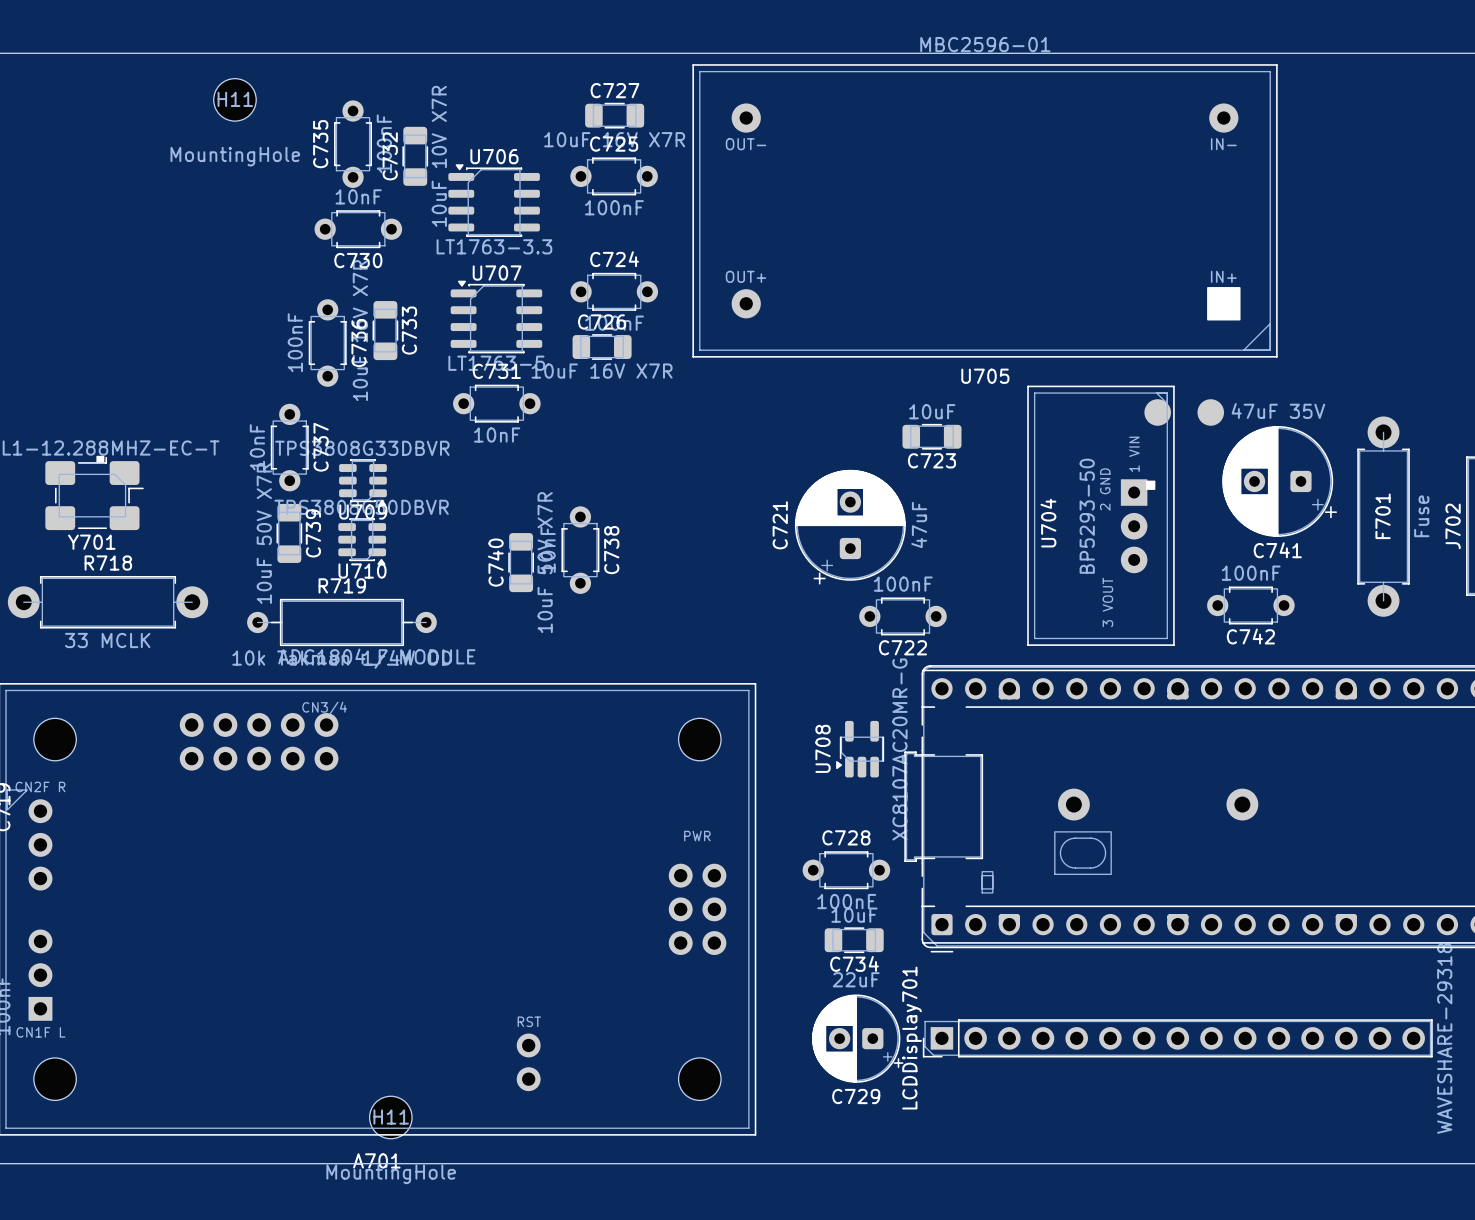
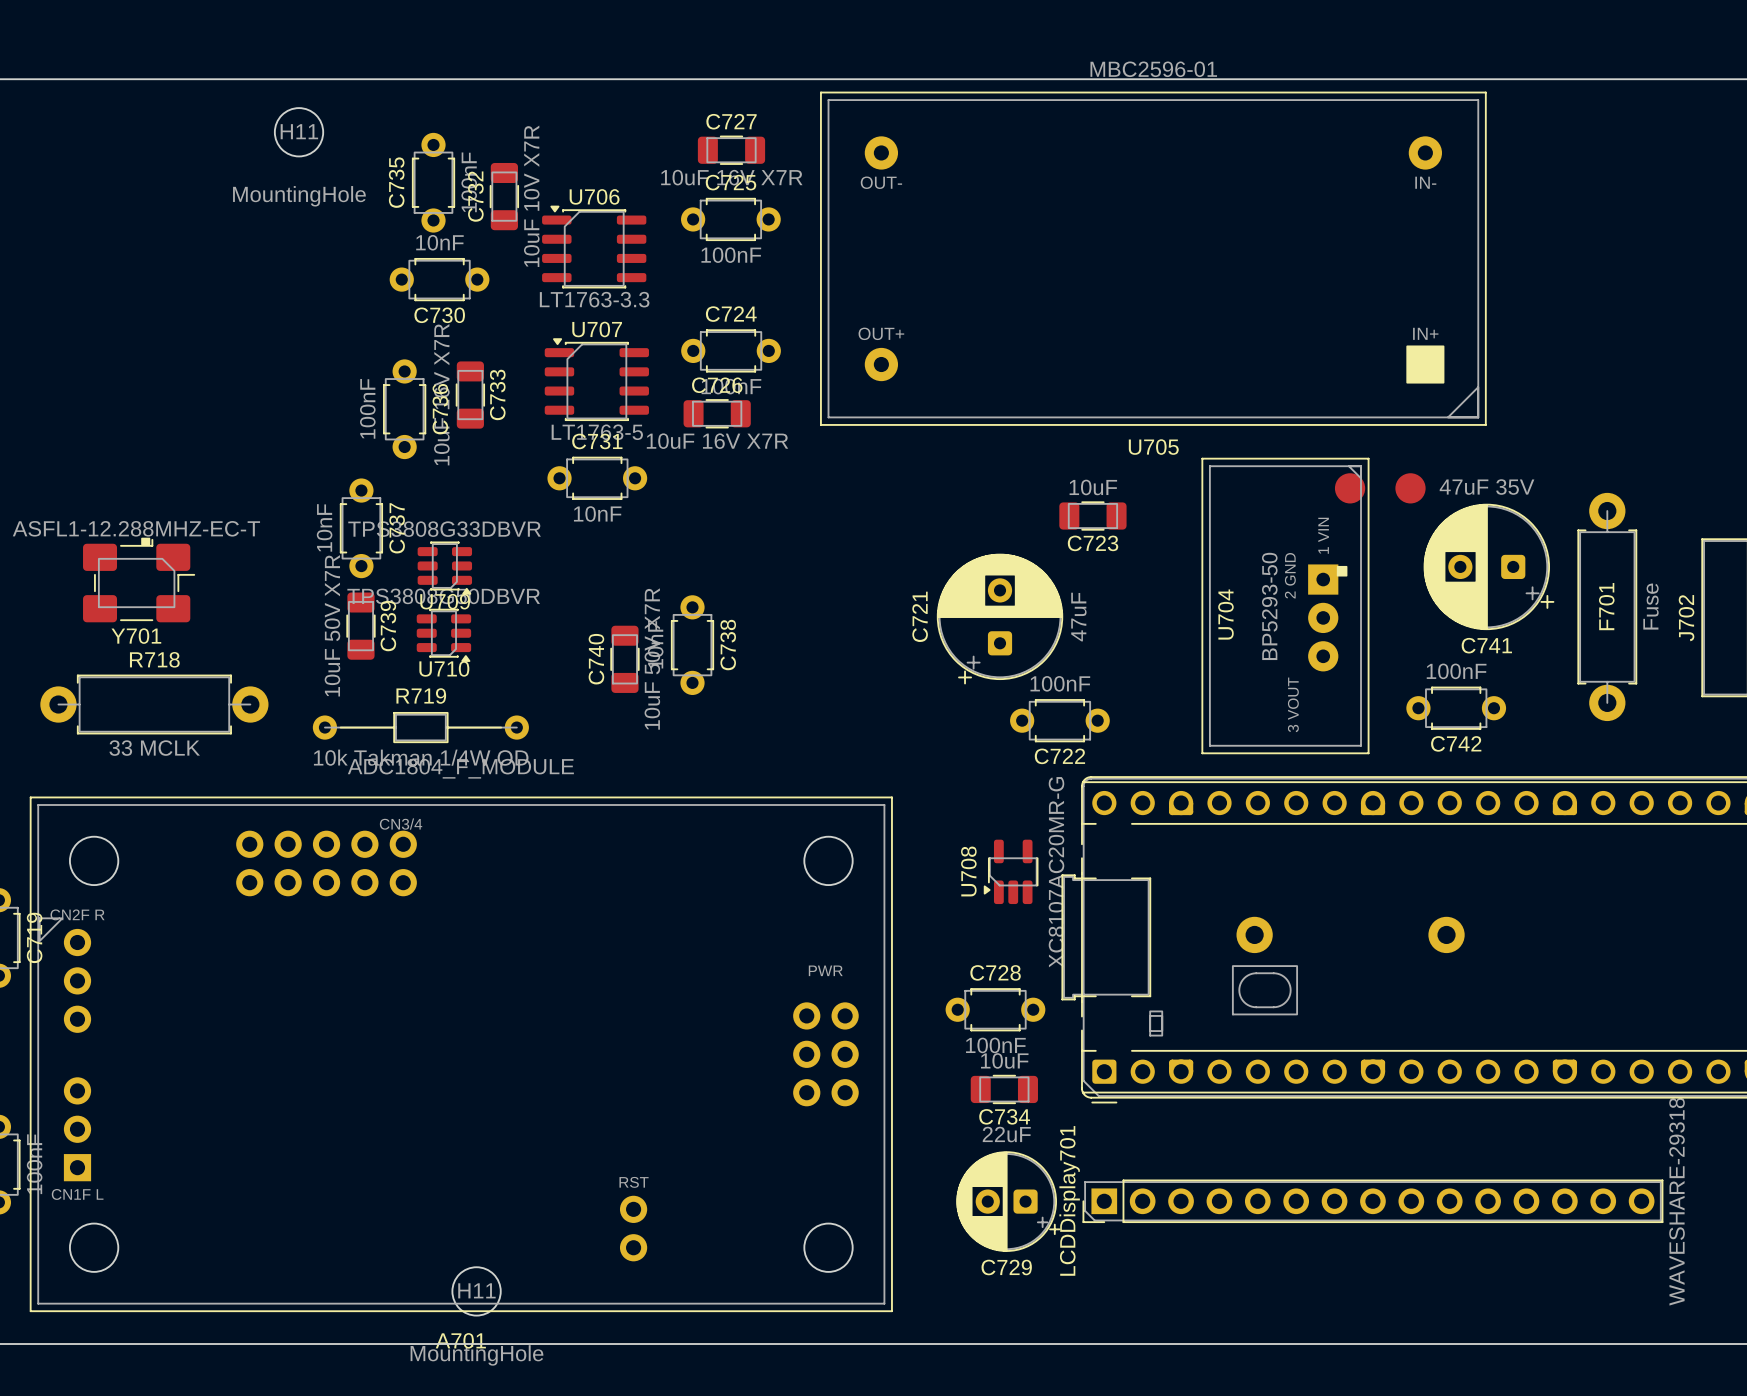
R719 footprint: [247, 598, 437, 647] -> [312, 711, 529, 744]

